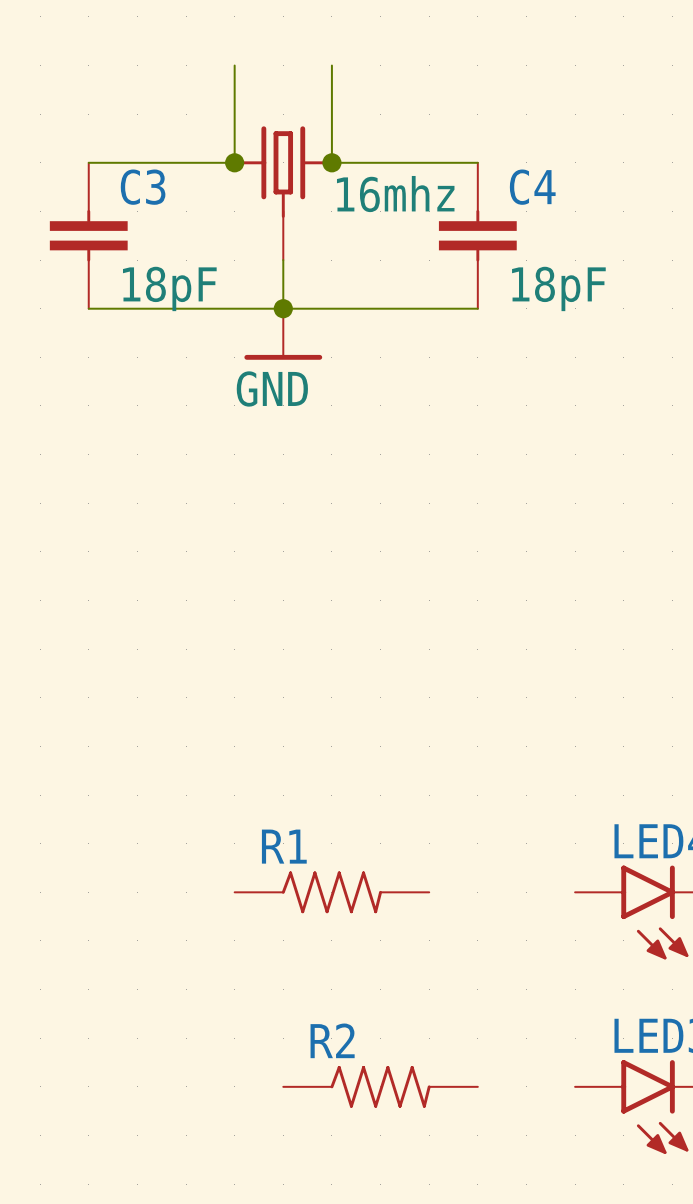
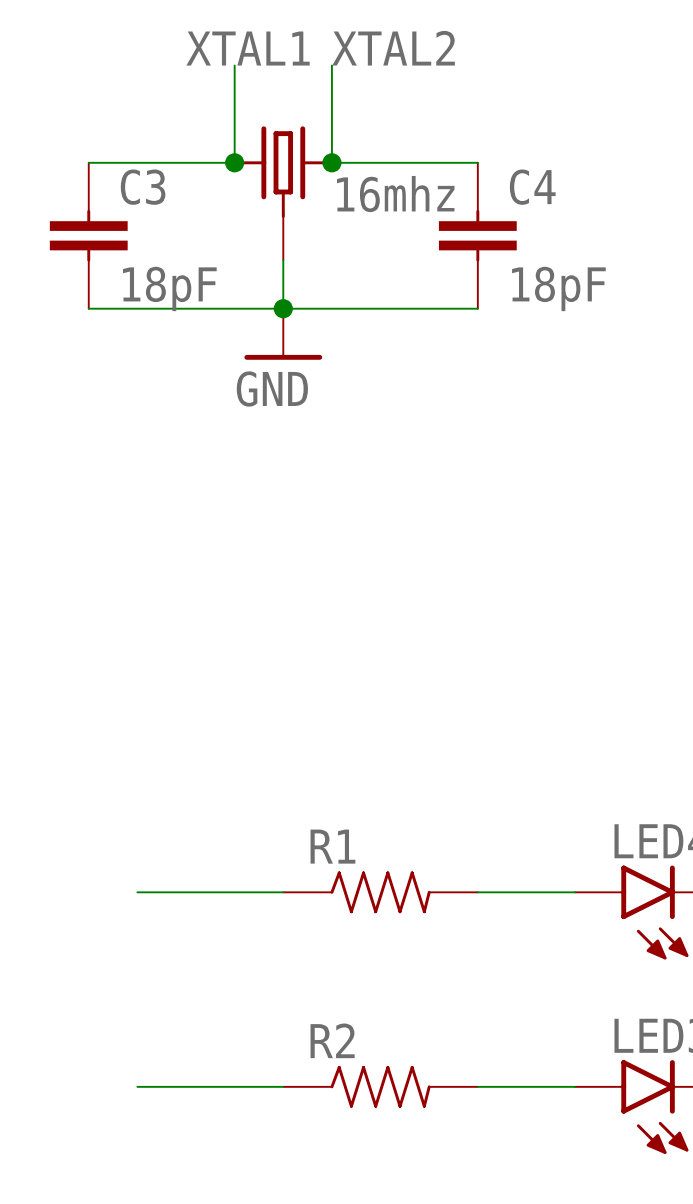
label: none -> XTAL1 (248, 48)
label: none -> XTAL2 (393, 48)
wire: none -> (137, 892) (283, 892)
R1 position: (331, 892) -> (380, 892)
wire: none -> (477, 892) (575, 892)
wire: none -> (137, 1086) (283, 1086)
wire: none -> (477, 1086) (575, 1086)

